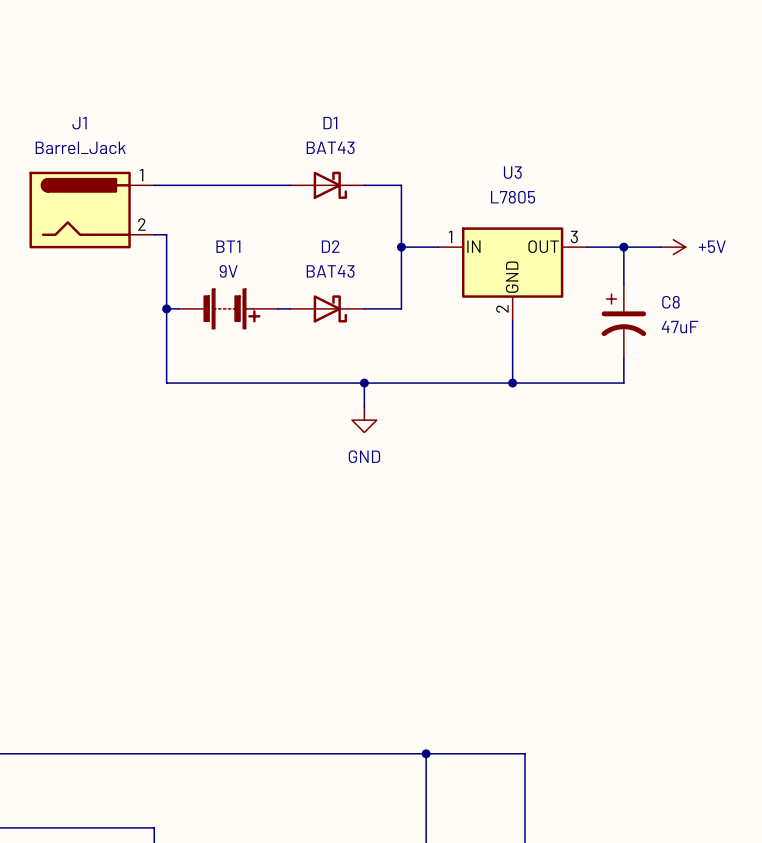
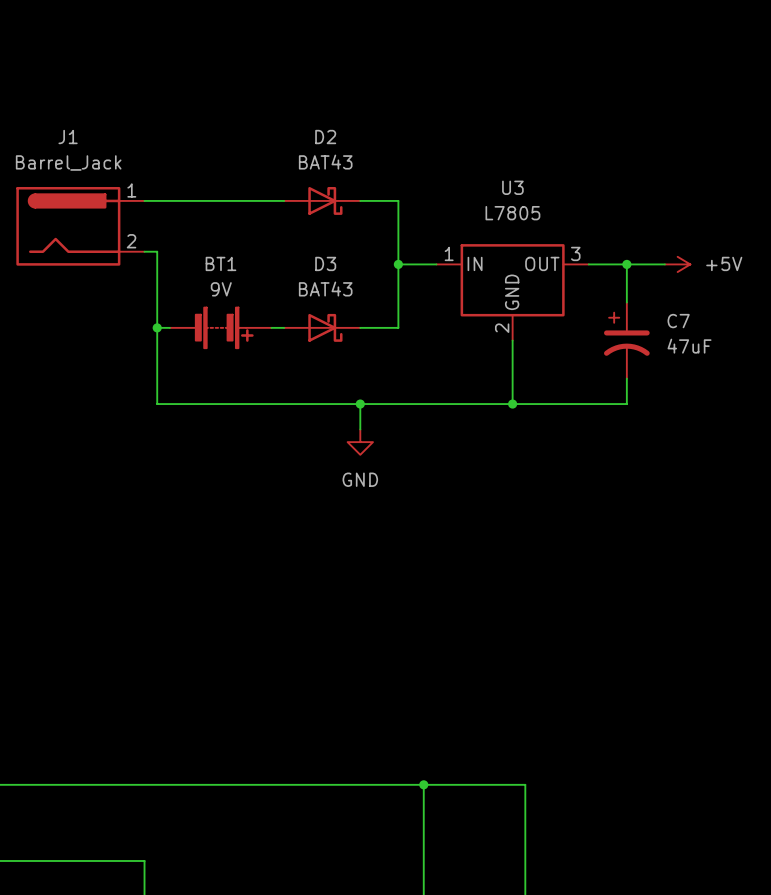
D1 name: D1 (330, 123) -> D2 (325, 137)
D2 name: D2 (330, 246) -> D3 (325, 263)
C8 name: C8 (670, 302) -> C7 (678, 321)

